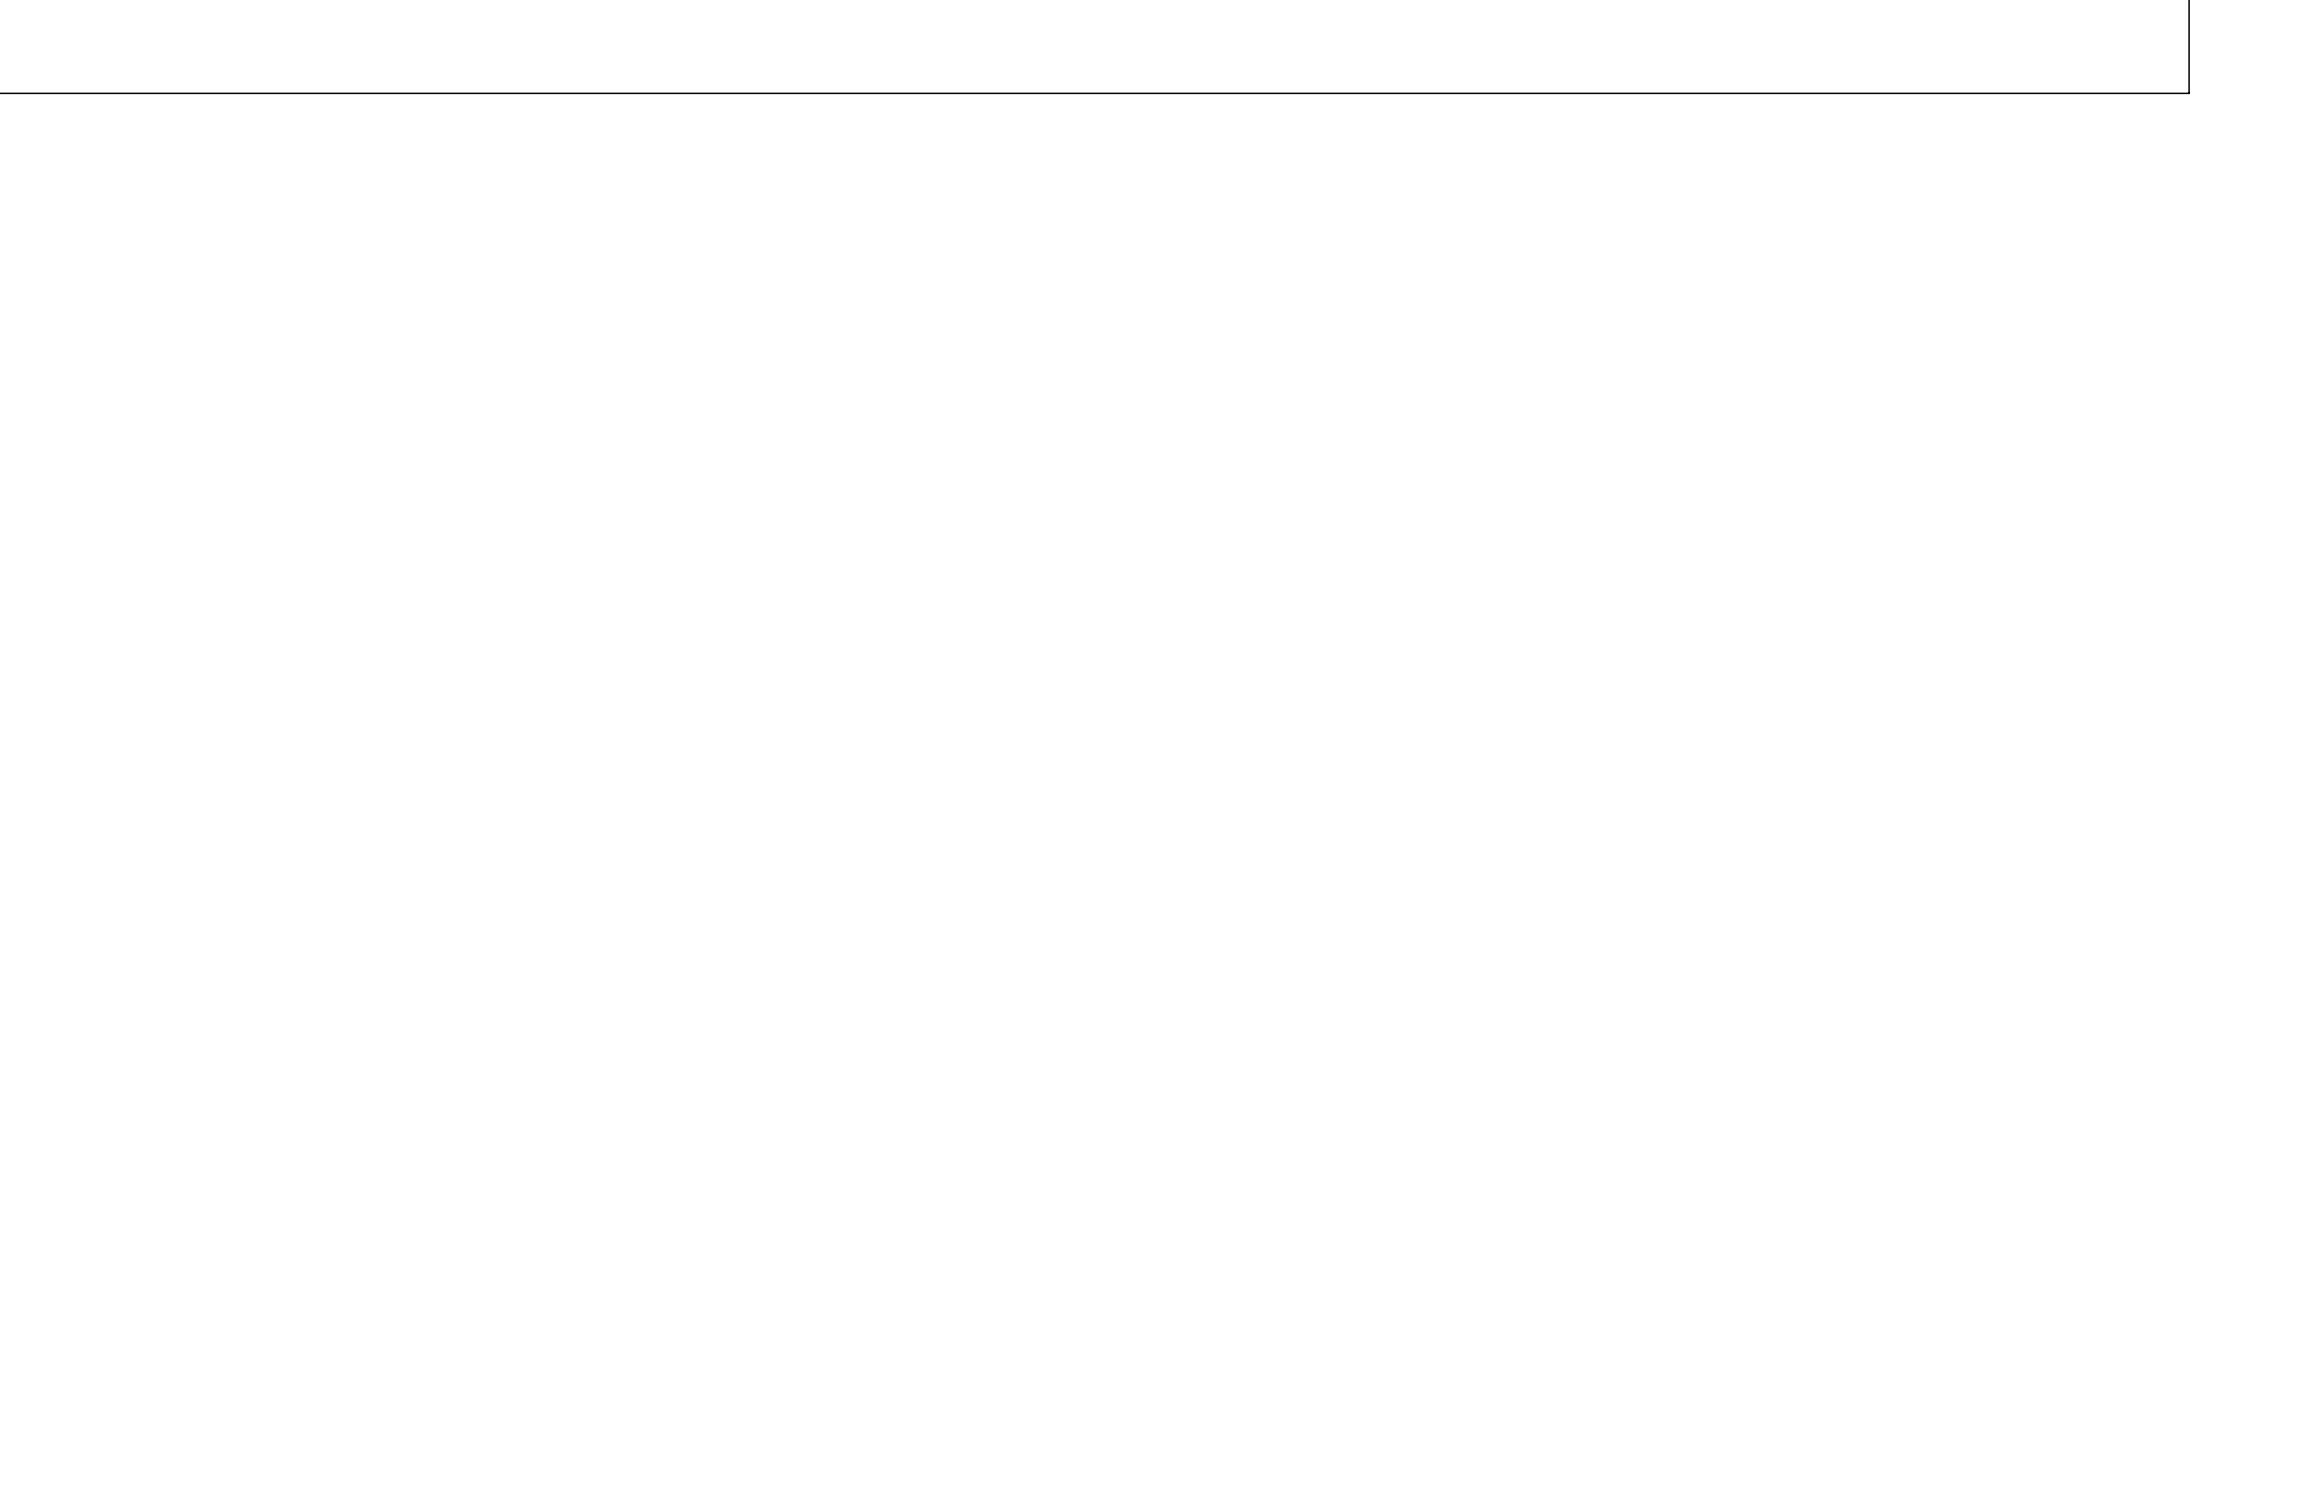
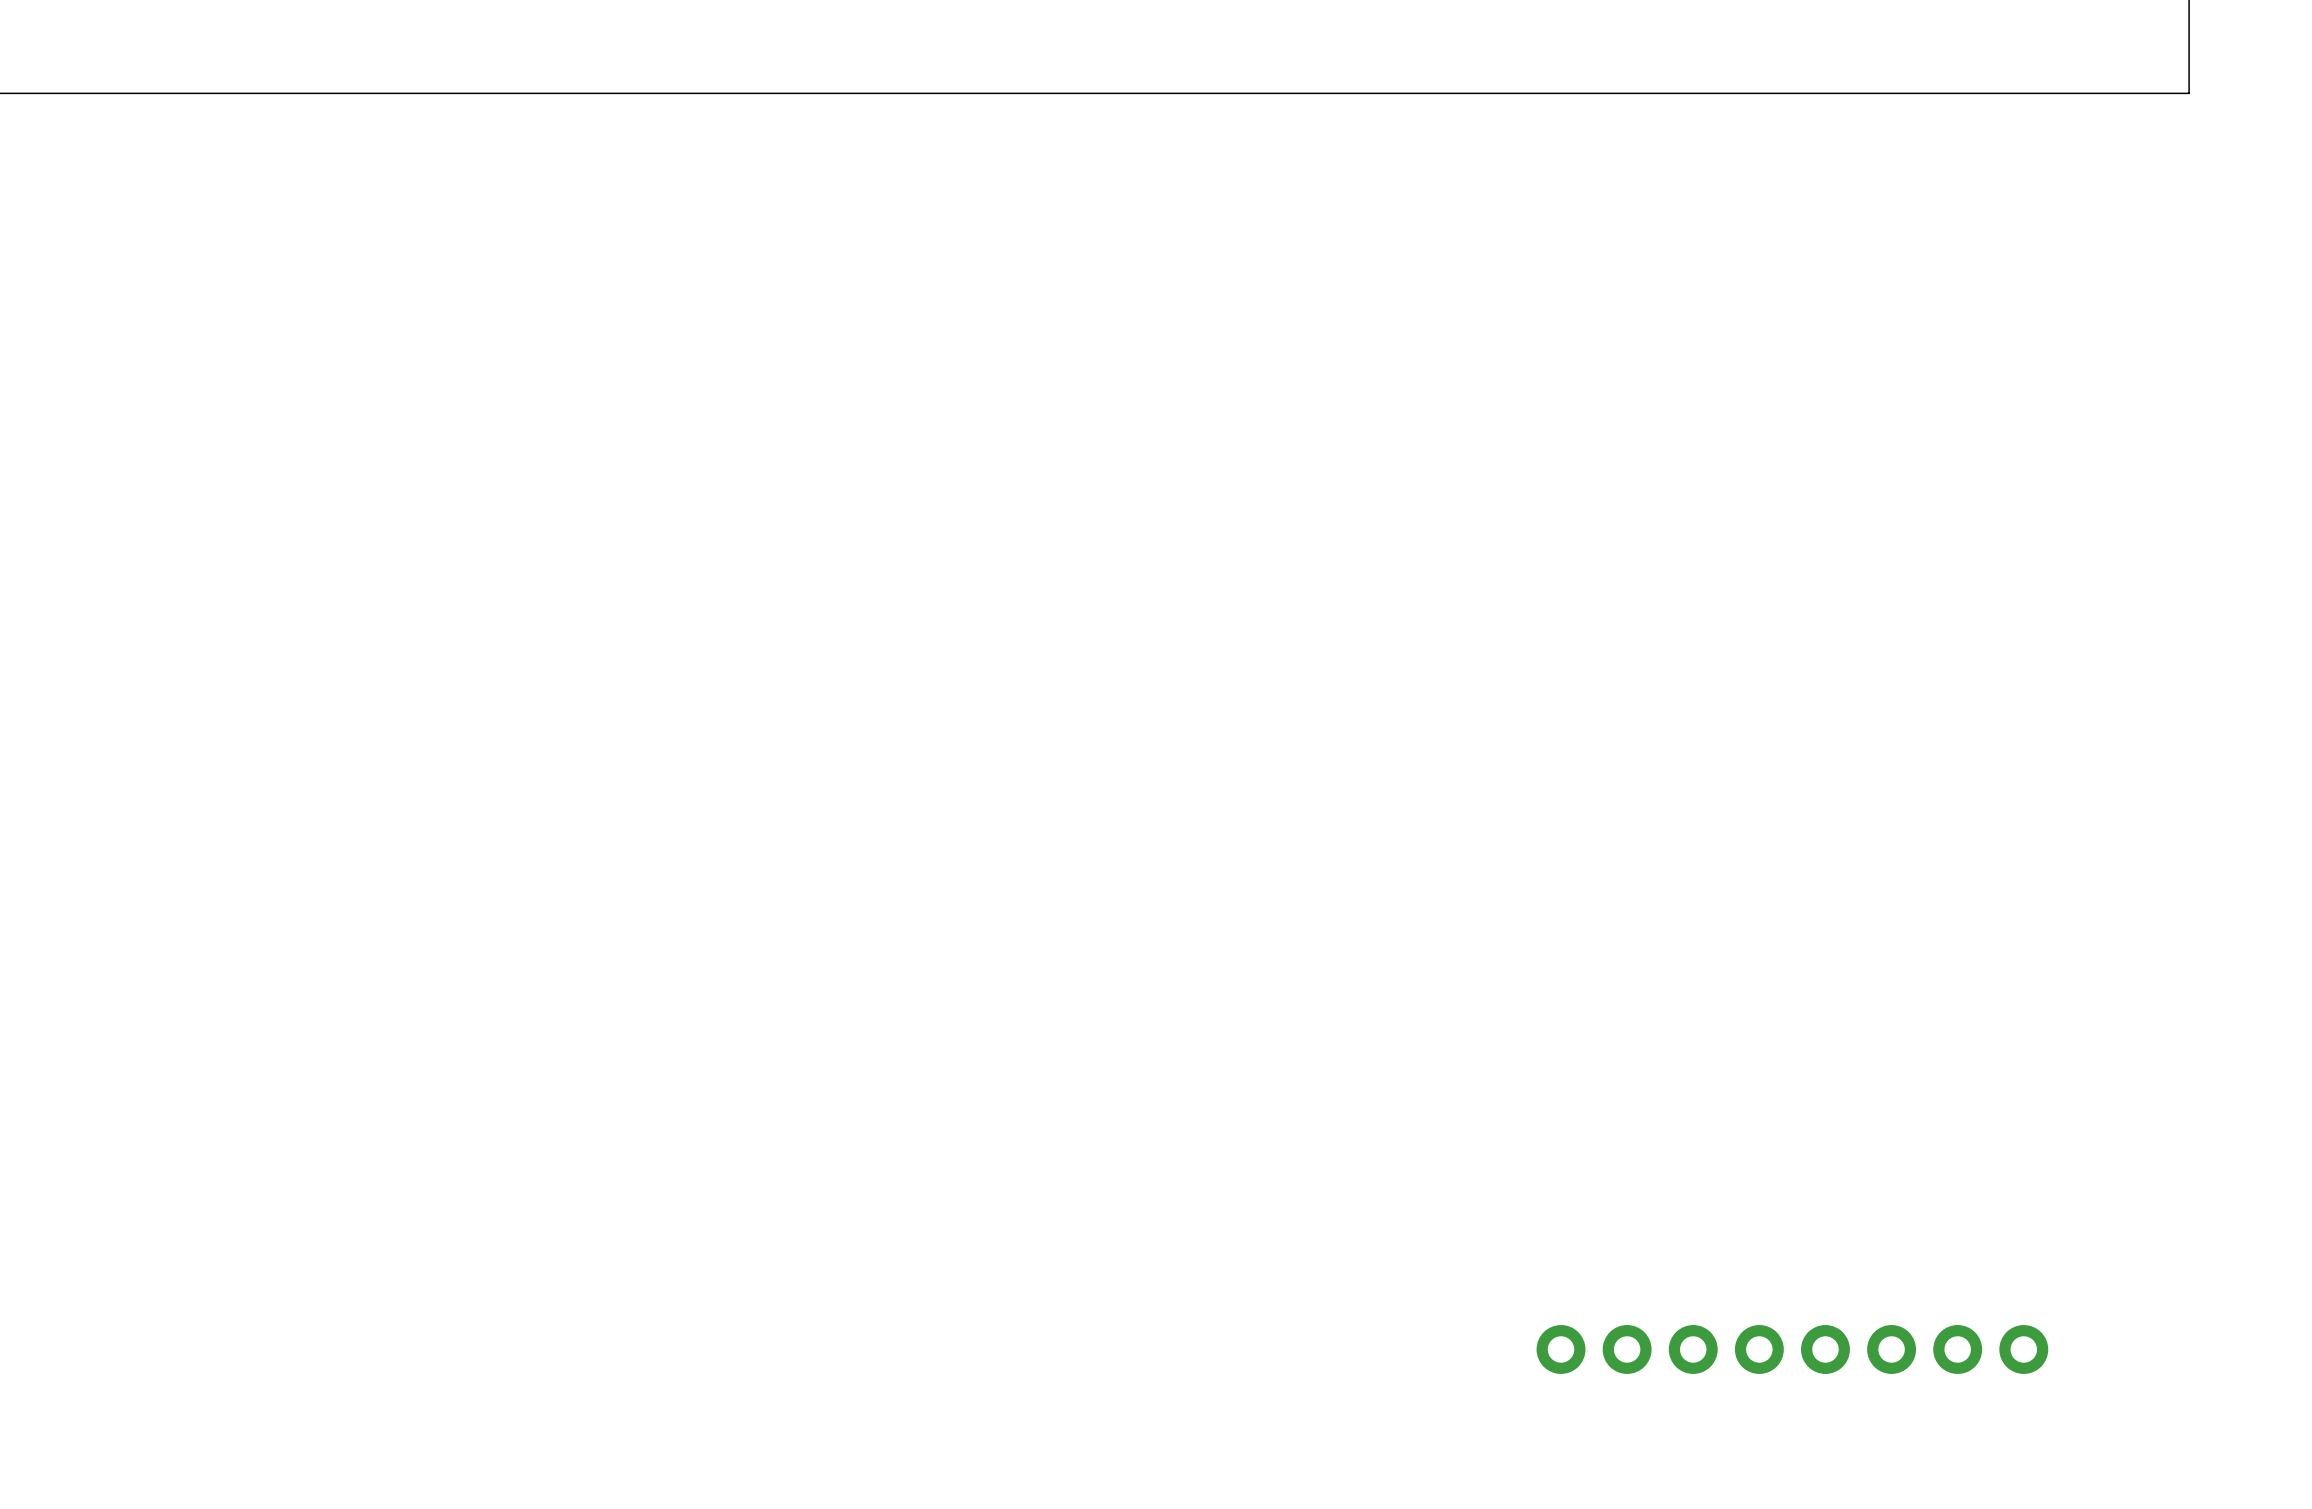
part: none -> (1792, 1349)

